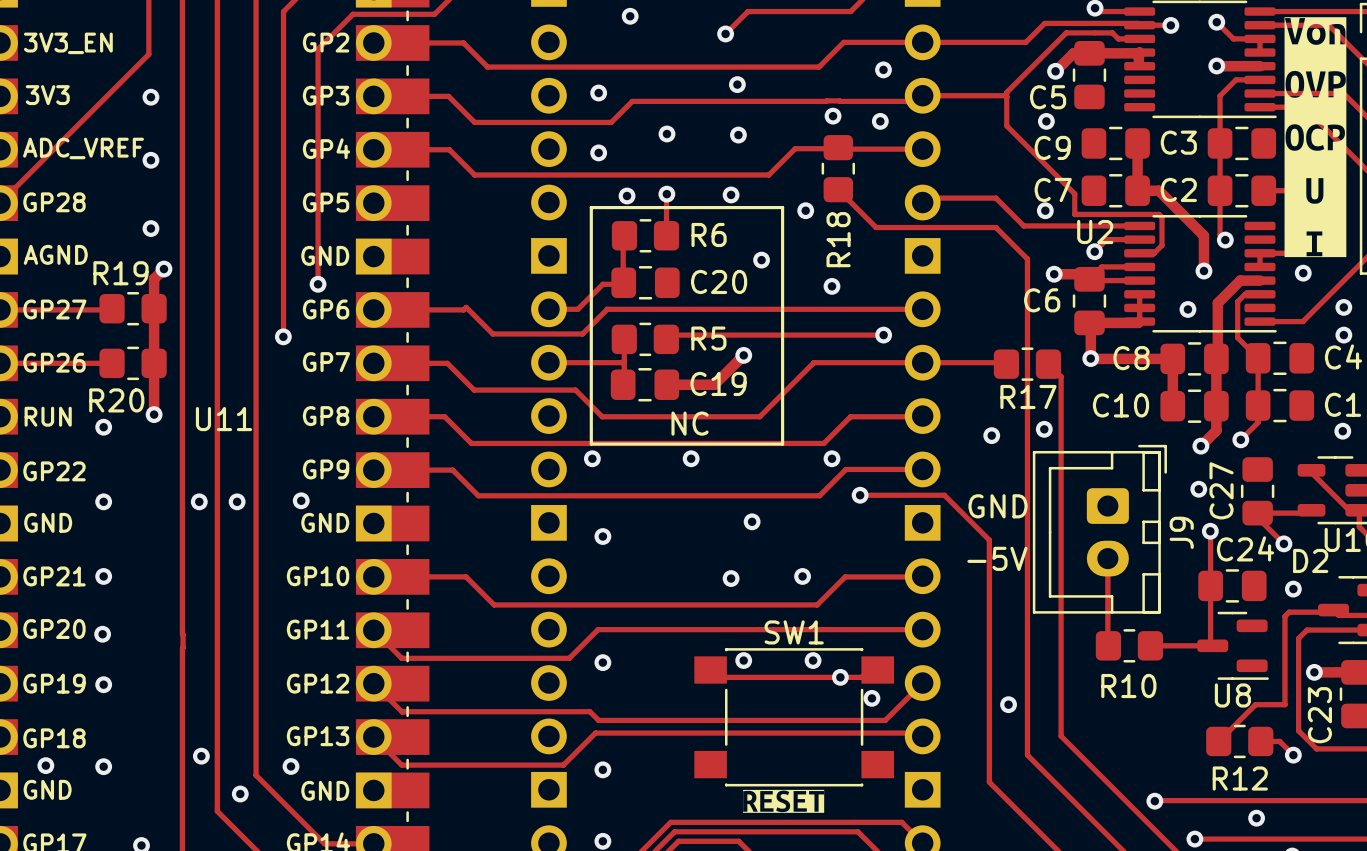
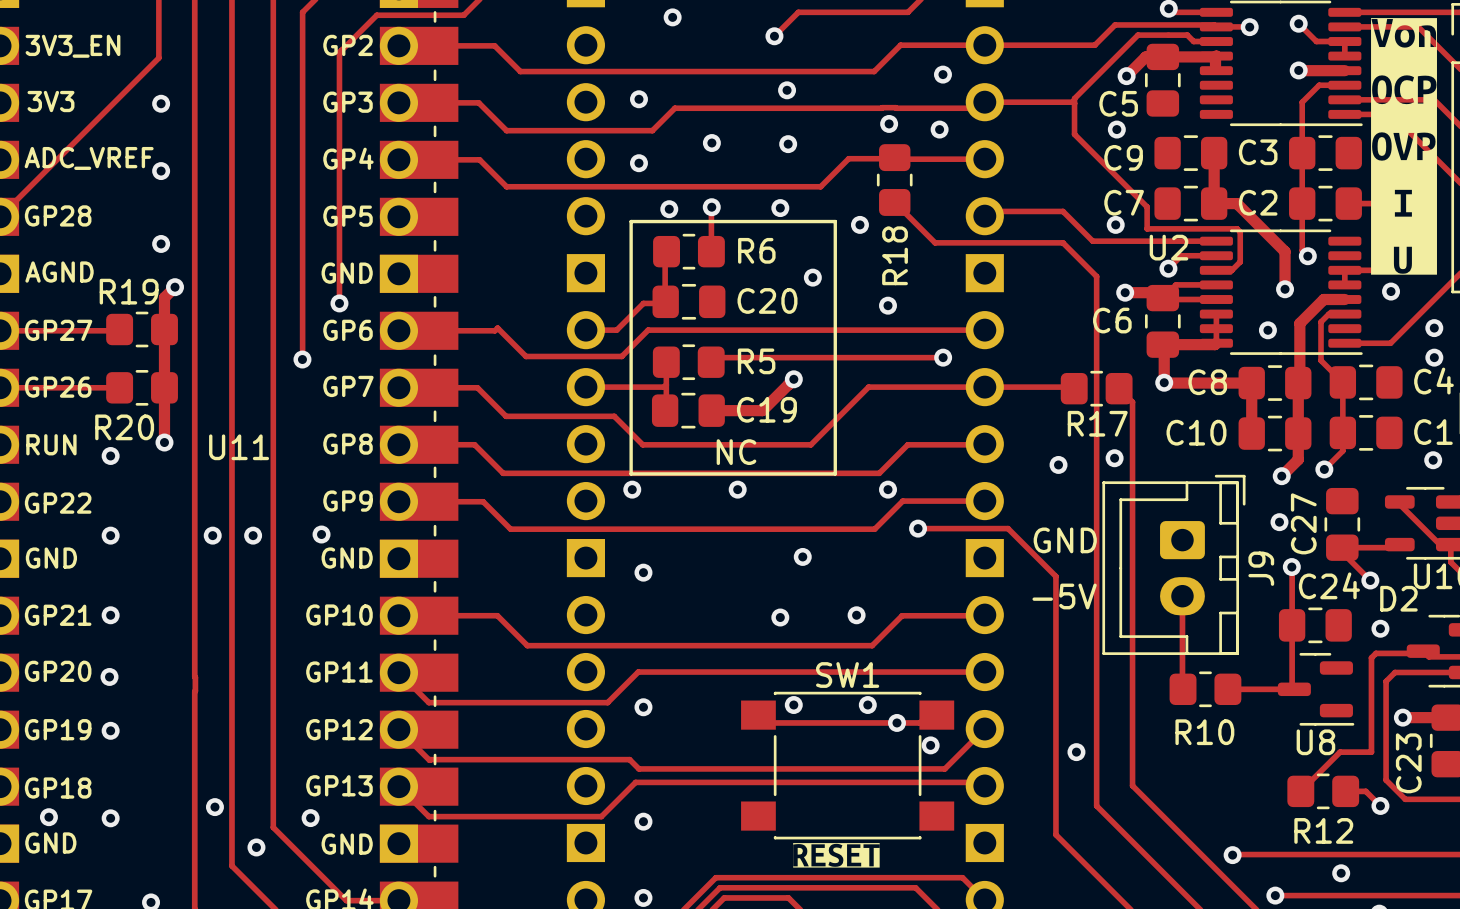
drawing shape: [1284, 17, 1347, 258] -> [1371, 18, 1437, 275]

